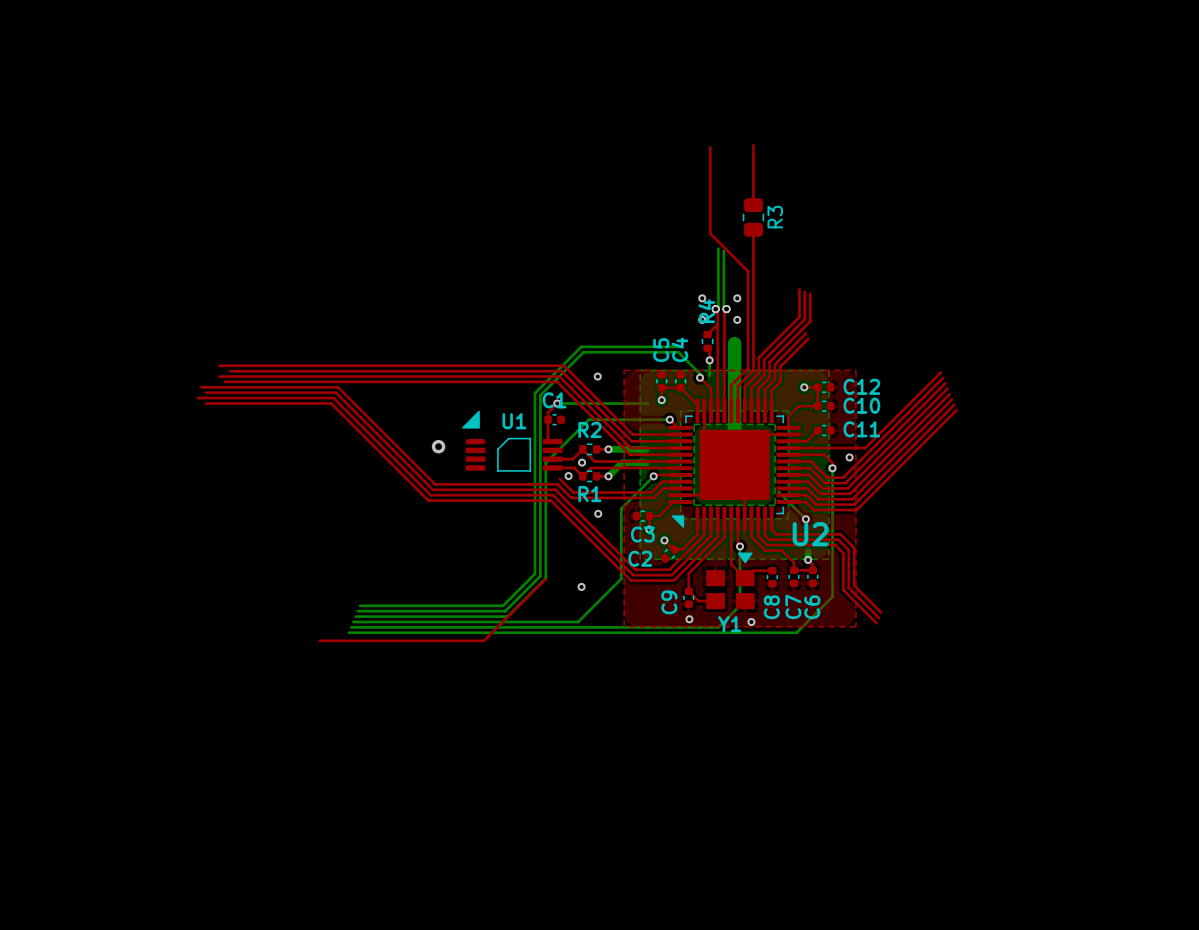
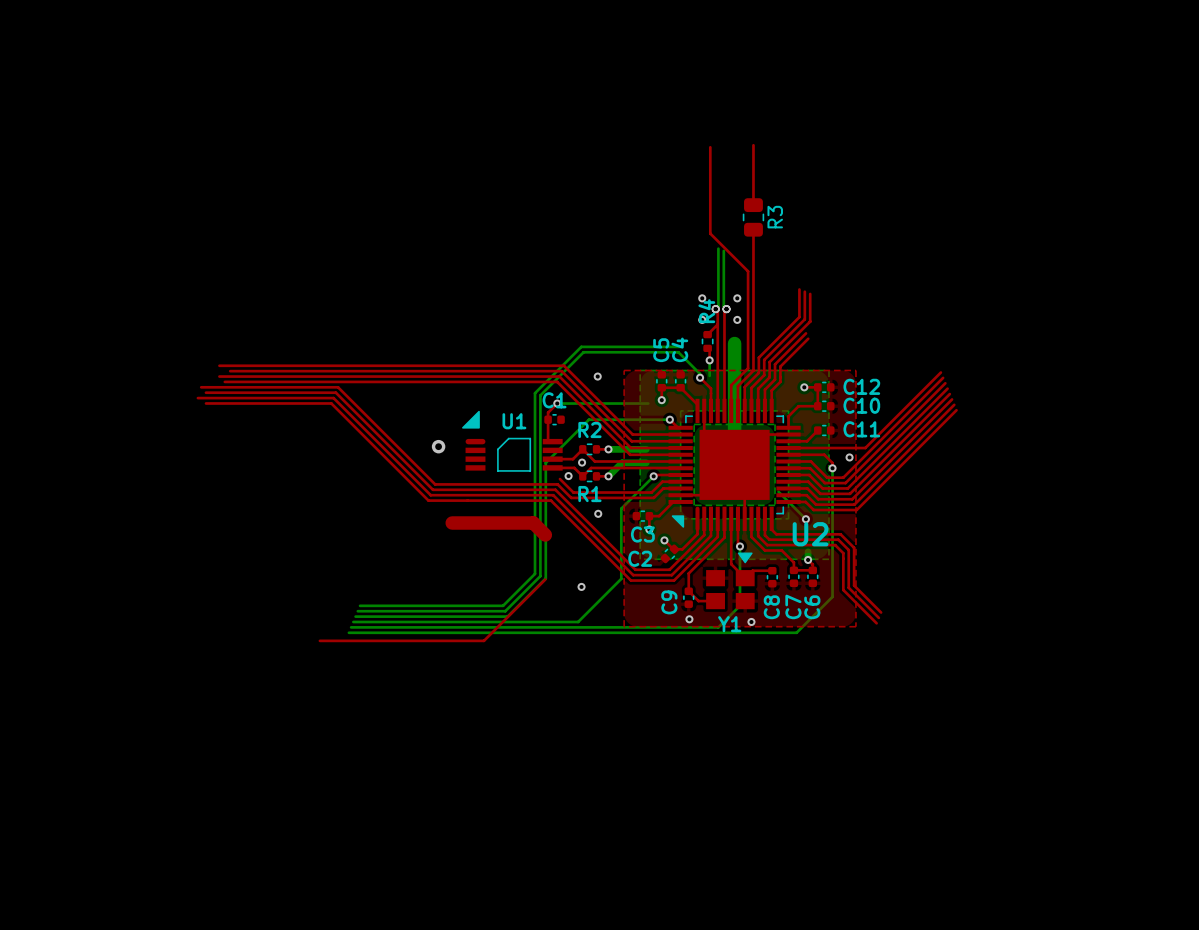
top track: none -> (452, 523) (533, 523) (545, 535)

